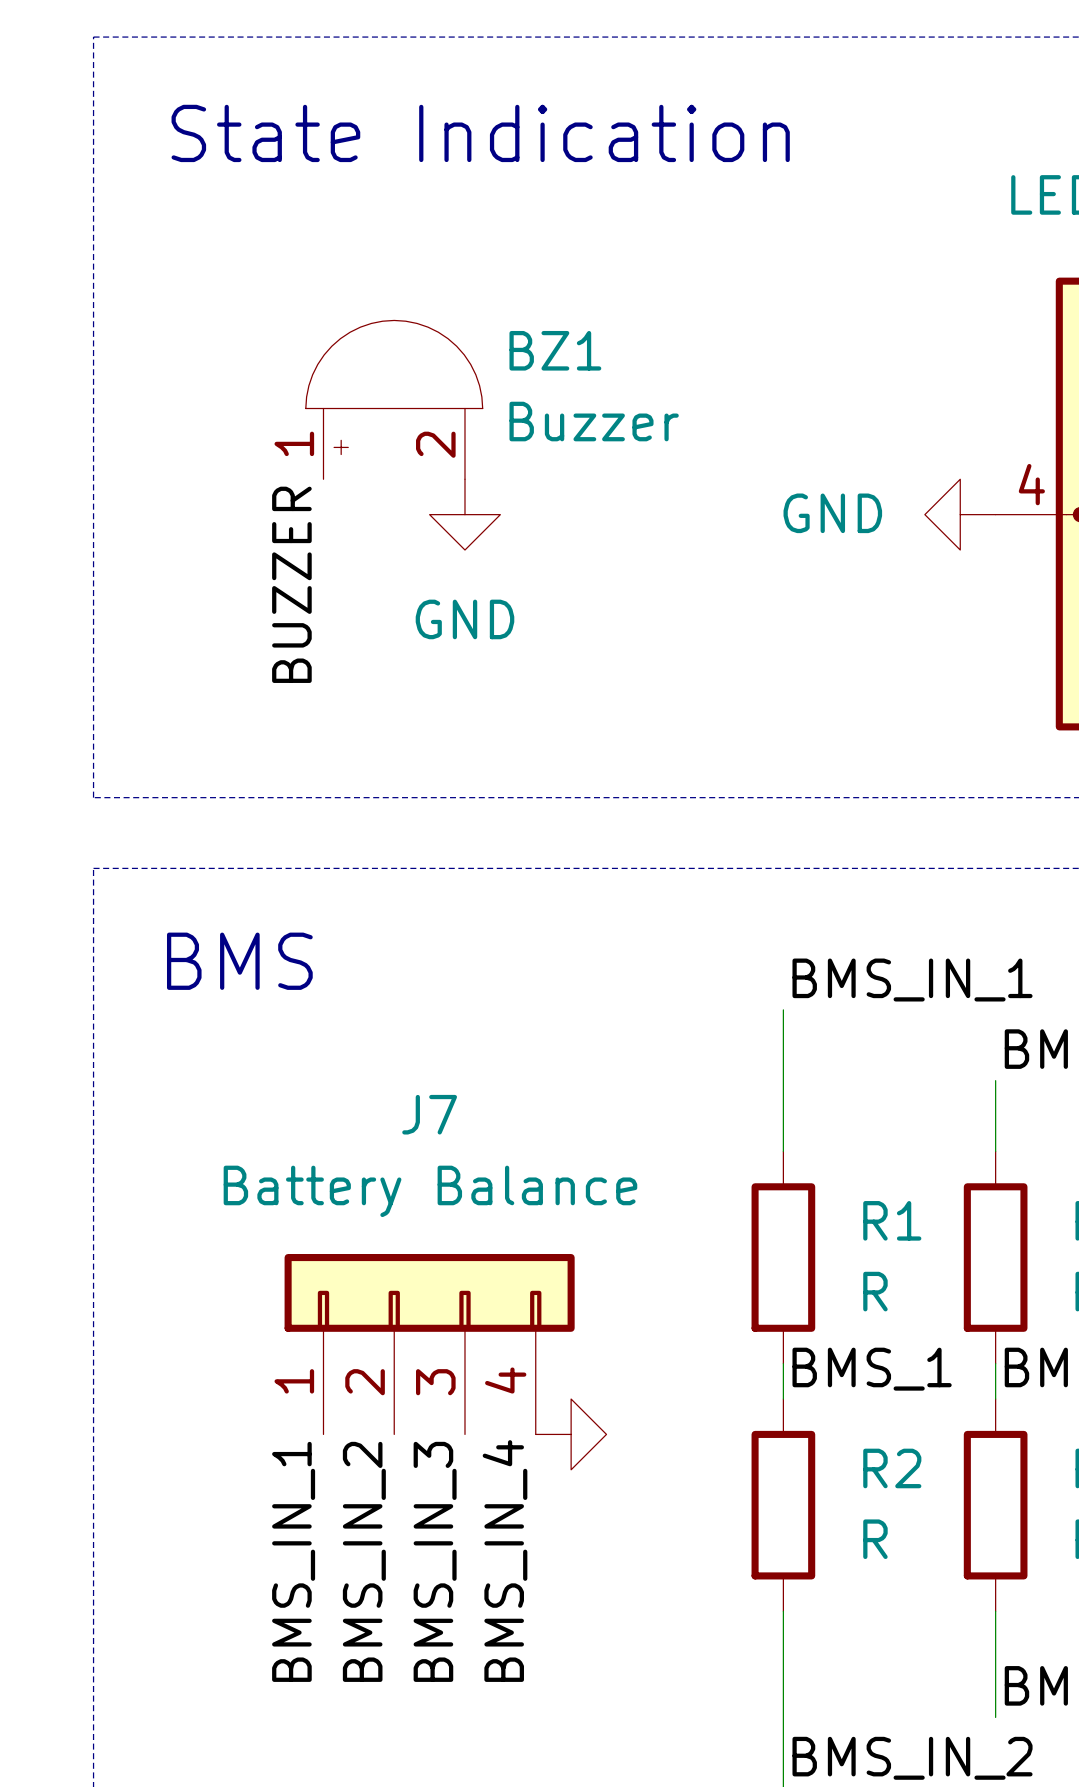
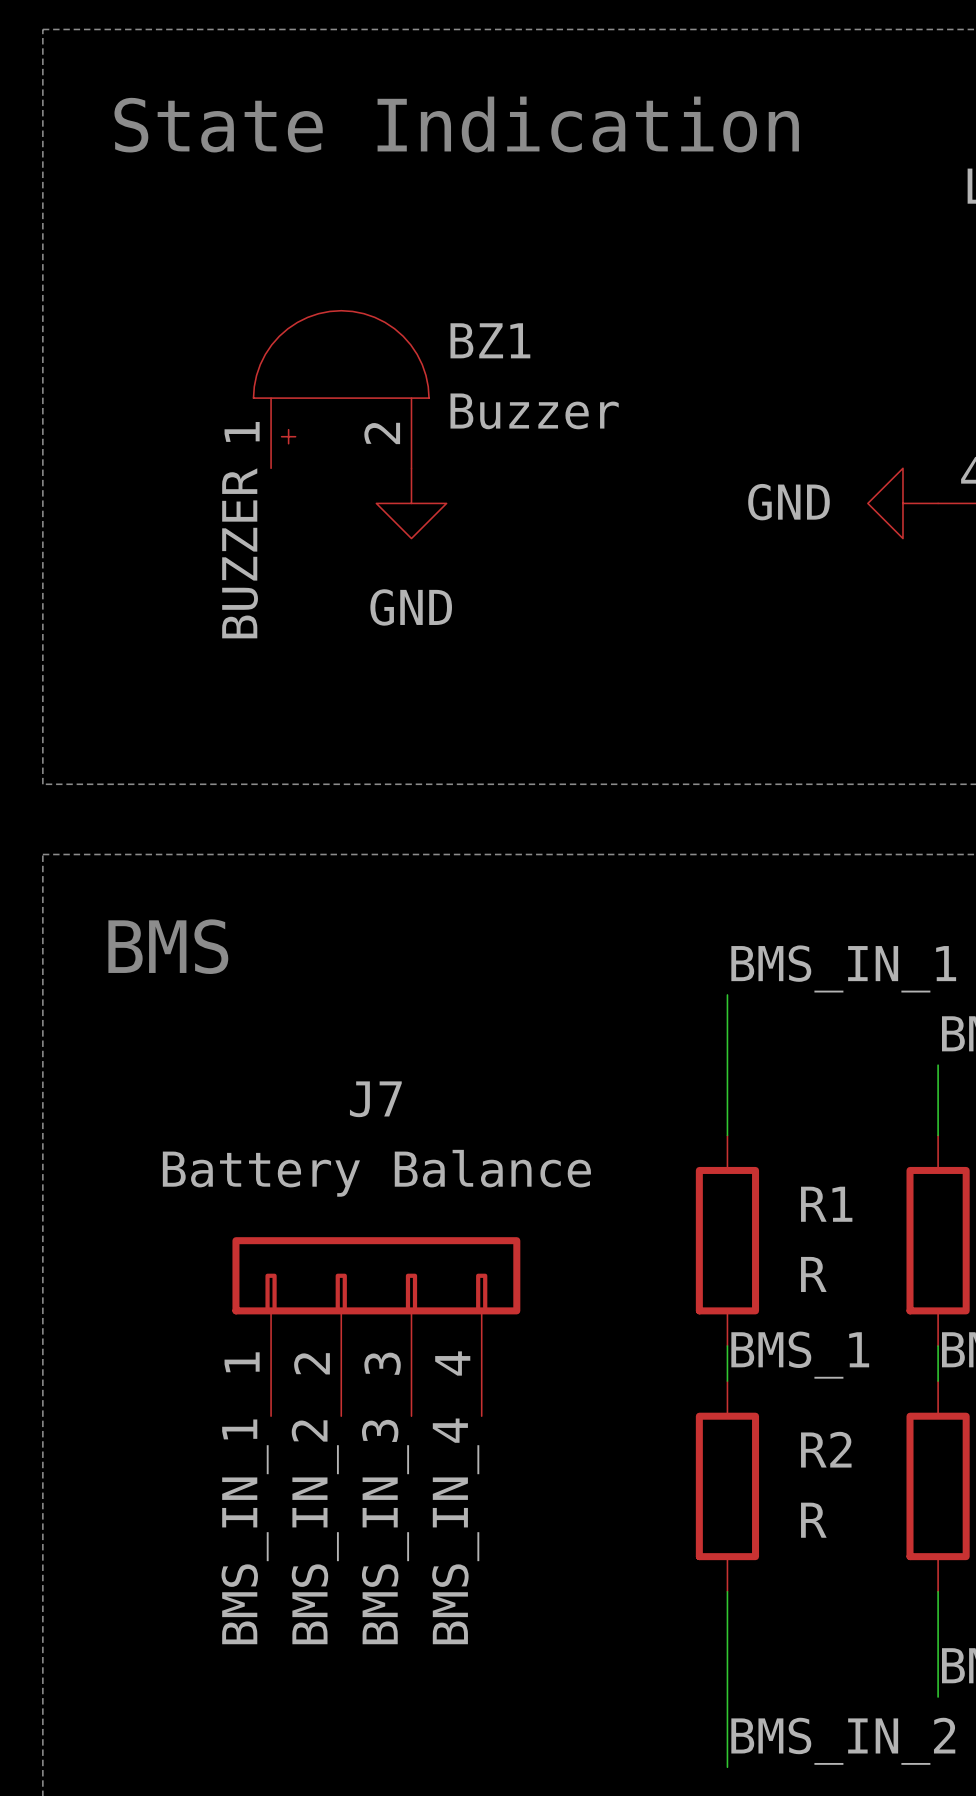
power symbol: (571, 1434) -> none

